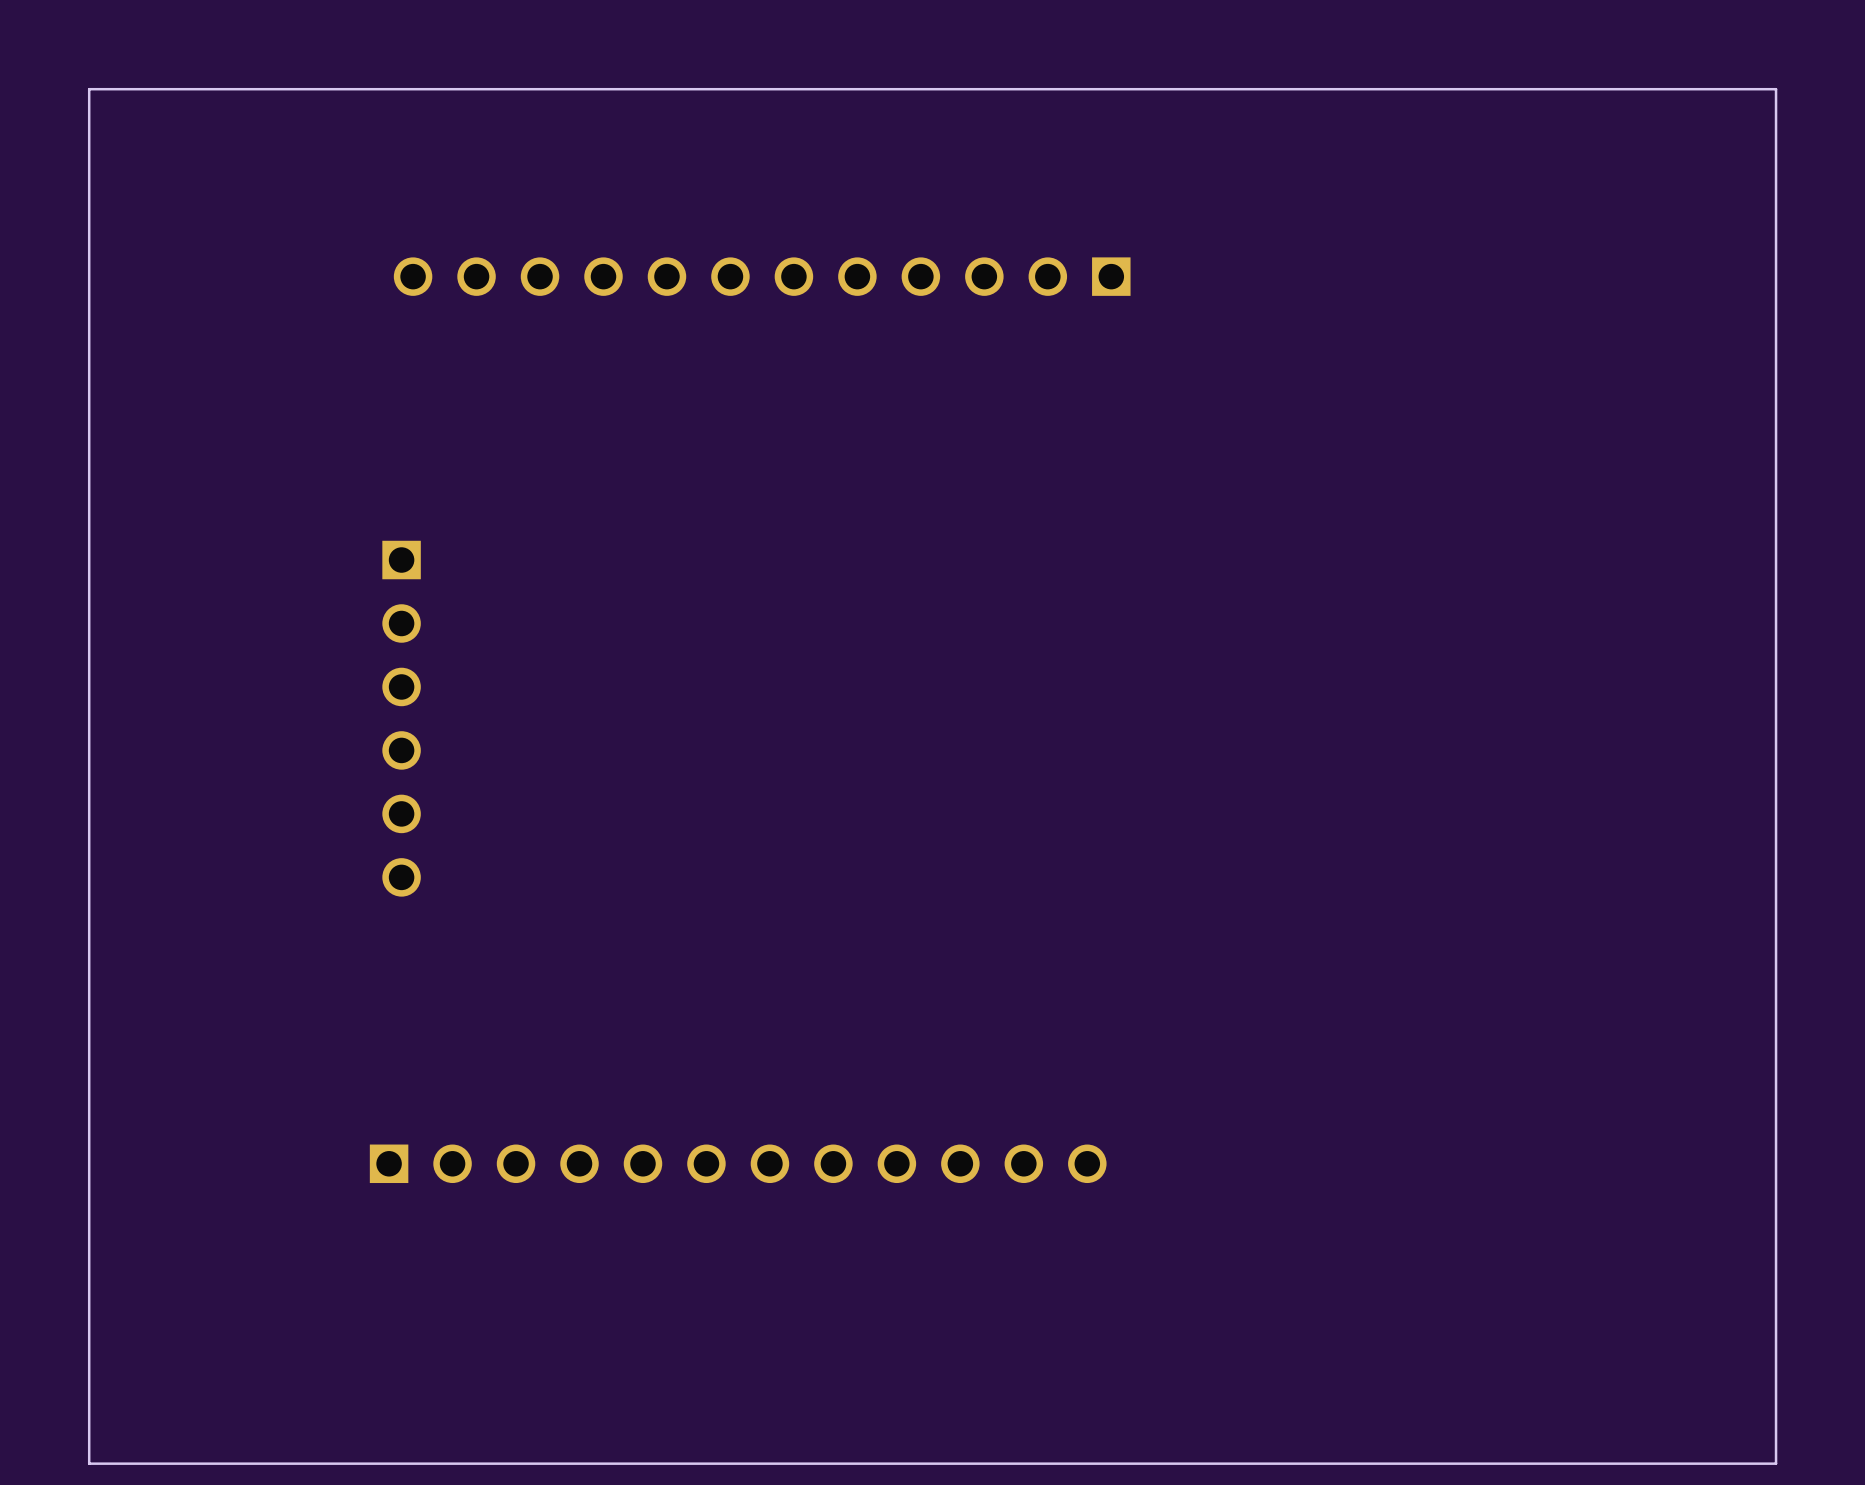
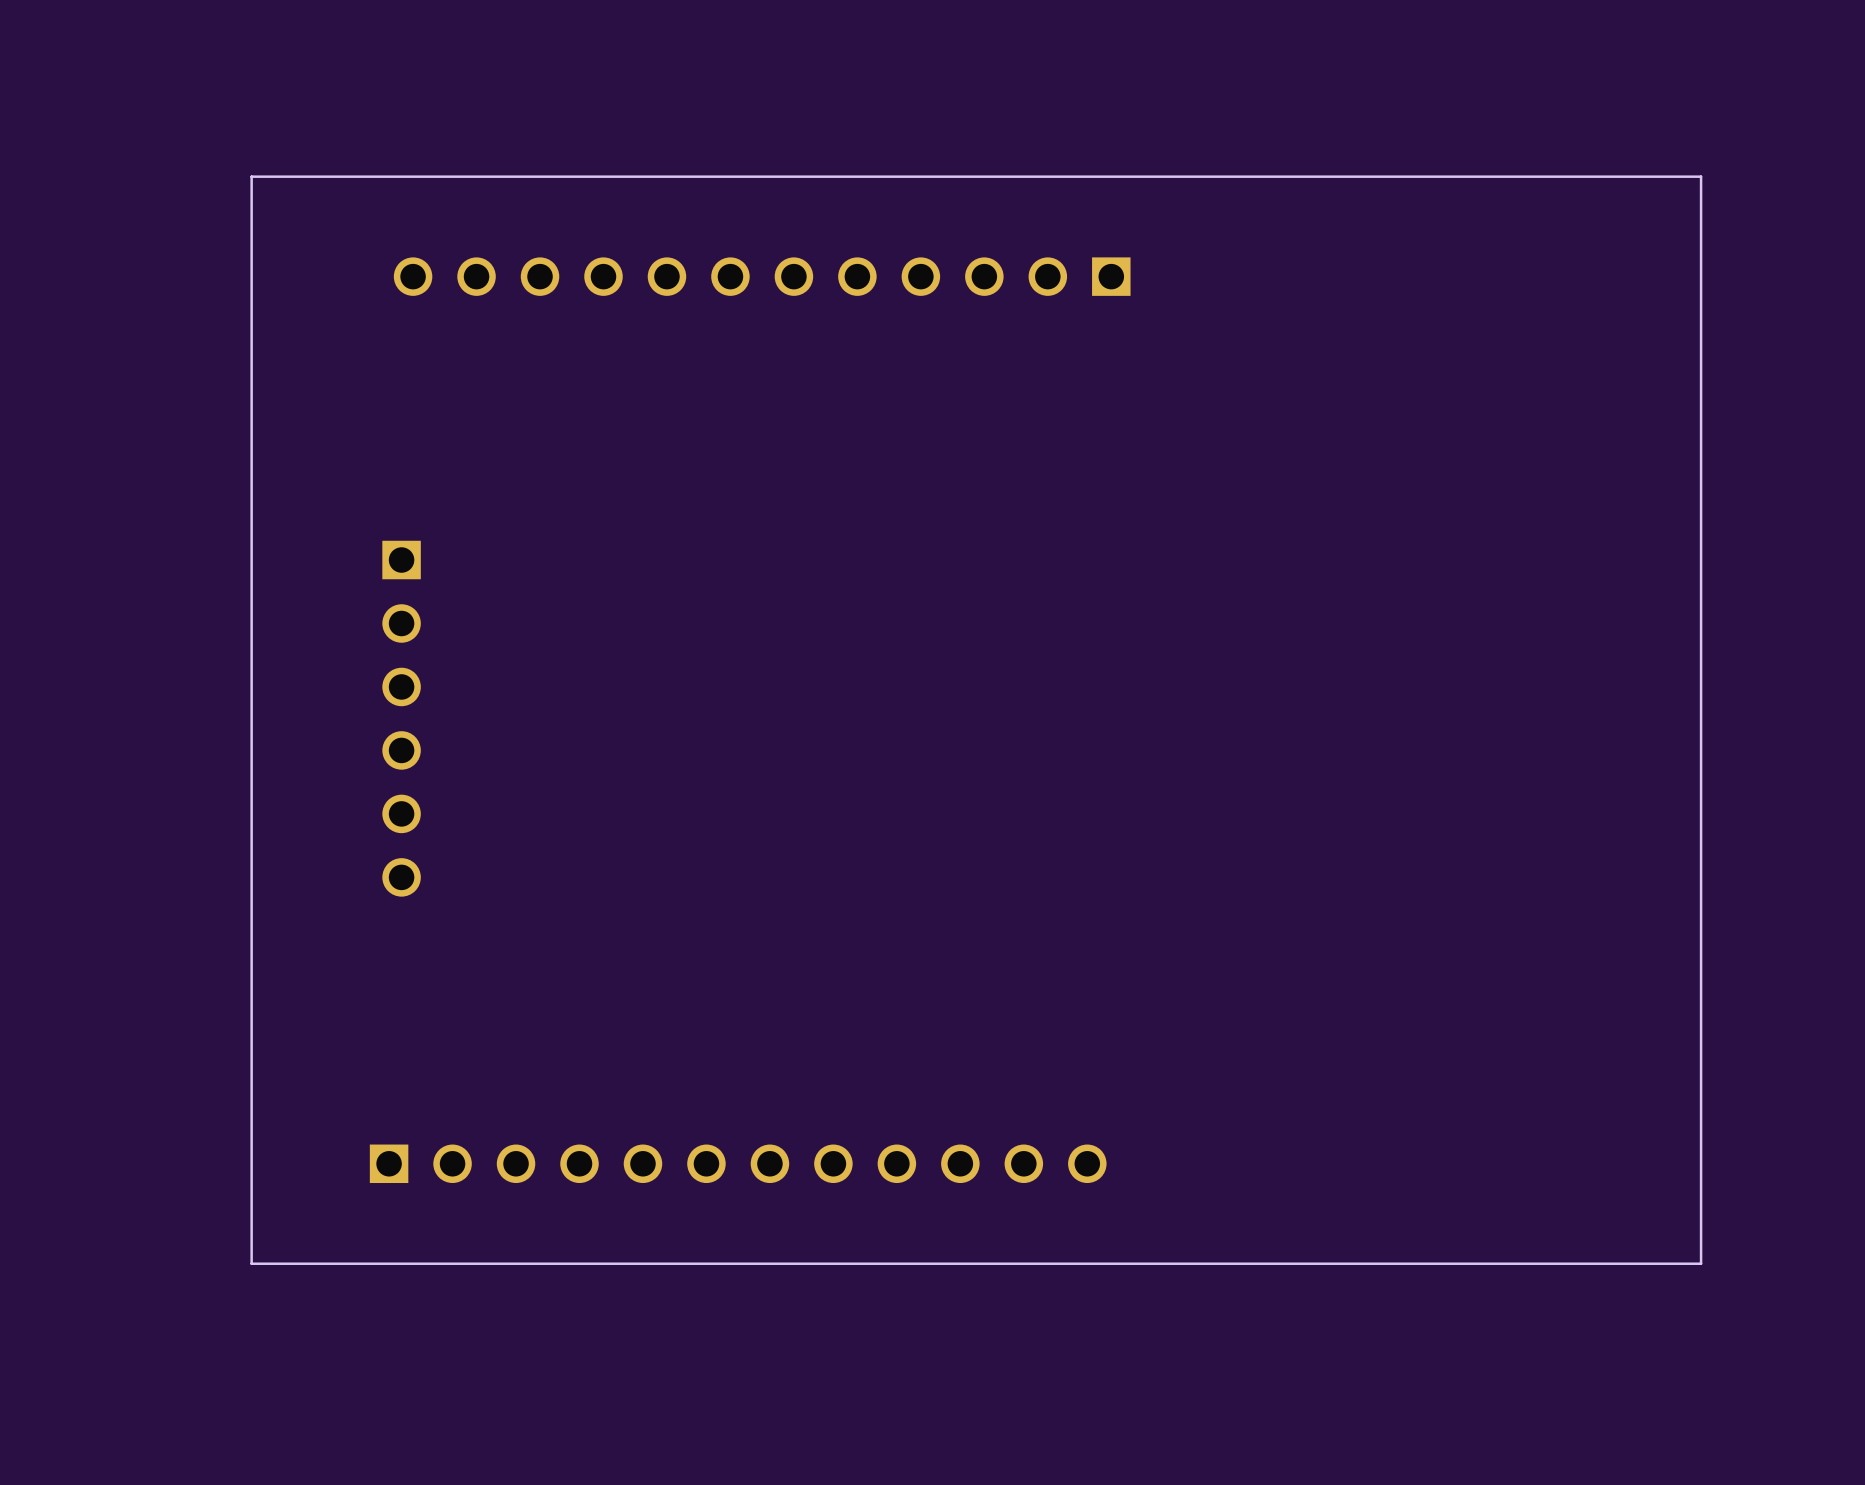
board edge: (1776, 89) (89, 89) (89, 1463) (1776, 1463) (1776, 89) -> (1701, 176) (1701, 1263) (251, 1263) (251, 176) (1701, 176)

